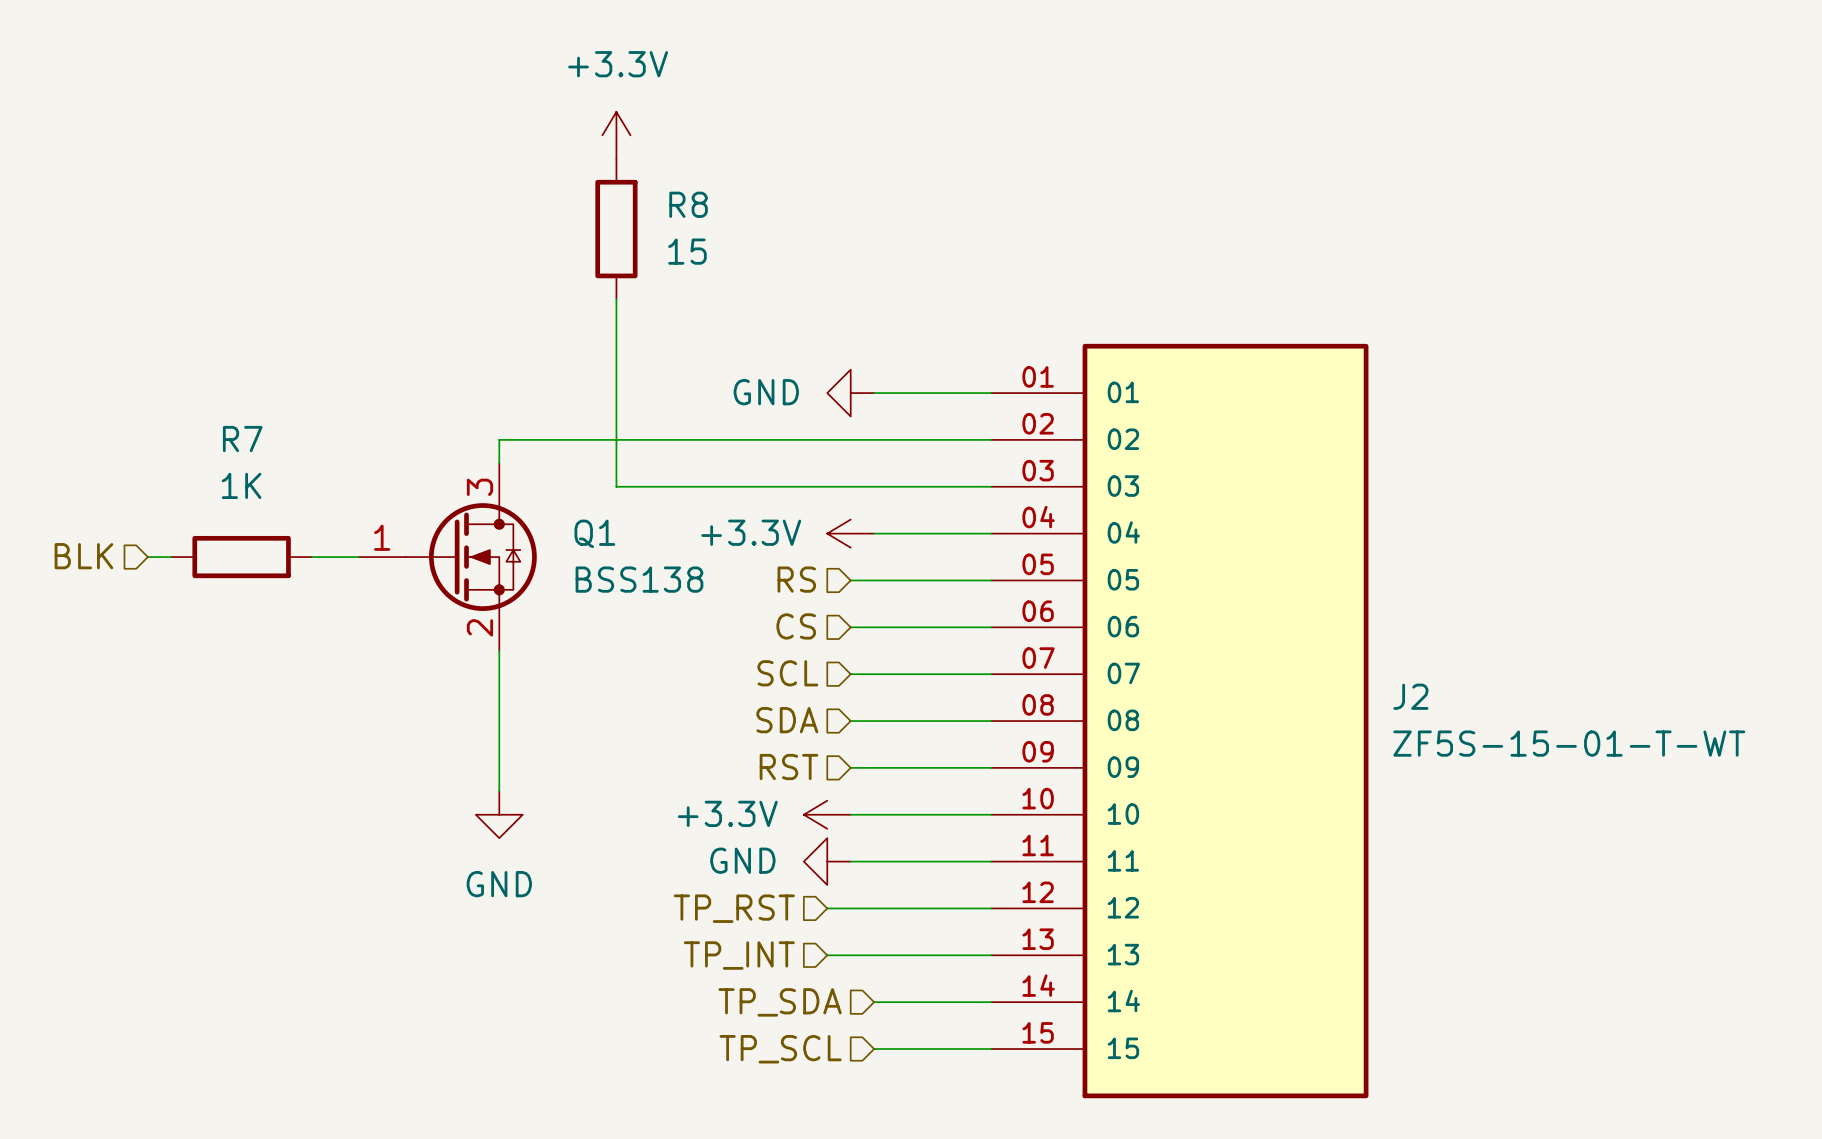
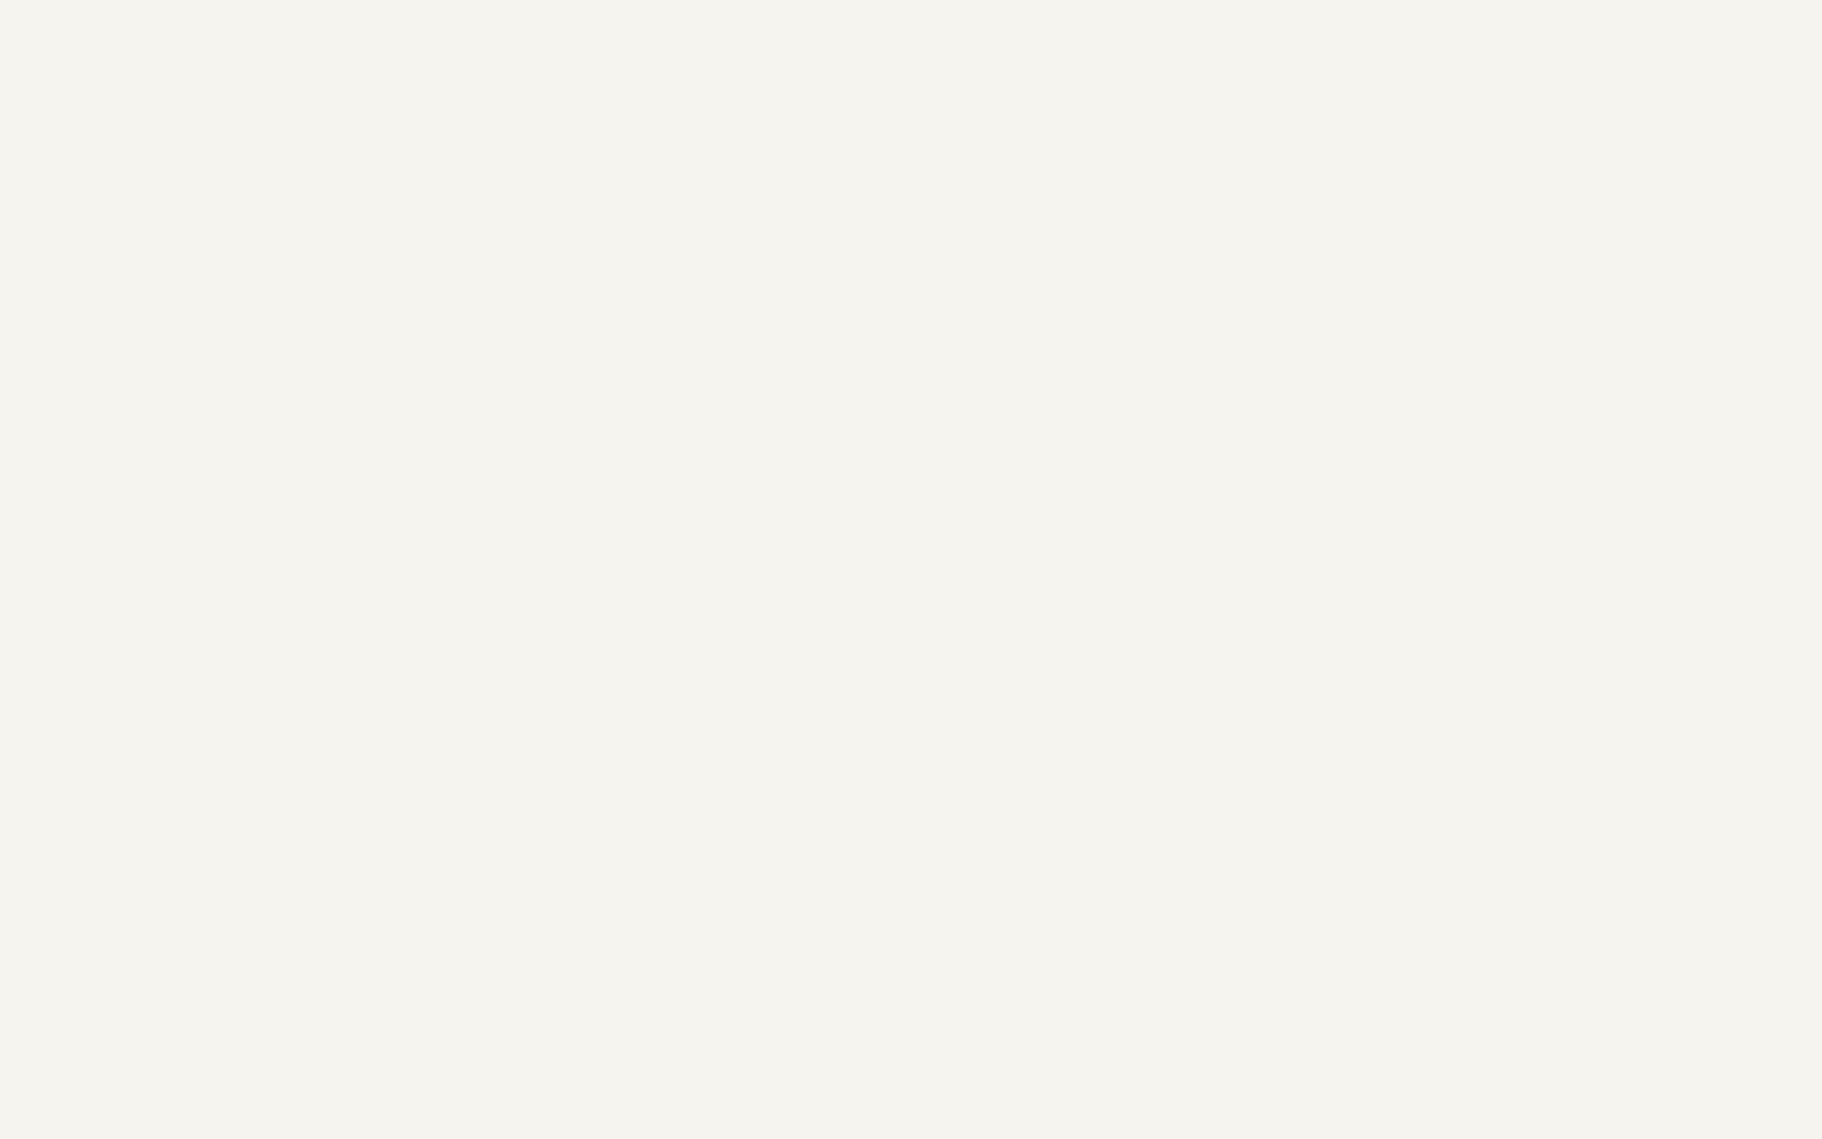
power symbol: +3.3V (616, 135) -> none
R8: 15 (616, 229) -> none
wire: (616, 299) (616, 486) (991, 486) -> none
power symbol: GND (850, 393) -> none
wire: (874, 393) (991, 393) -> none
wire: (991, 439) (499, 439) (499, 463) -> none
power symbol: +3.3V (850, 533) -> none
wire: (874, 533) (991, 533) -> none
hierarchical label: BLK (83, 556) -> none
wire: (147, 557) (171, 557) -> none
R7: 1K (241, 557) -> none
wire: (311, 557) (358, 557) -> none
Q1: BSS138 (447, 557) -> none
hierarchical label: RS (796, 579) -> none
wire: (850, 580) (991, 580) -> none
hierarchical label: CS (796, 626) -> none
wire: (850, 627) (991, 627) -> none
wire: (499, 650) (499, 791) -> none
hierarchical label: SCL (787, 673) -> none
wire: (850, 674) (991, 674) -> none
hierarchical label: SDA (787, 720) -> none
wire: (850, 721) (991, 721) -> none
J2: ZF5S-15-01-T-WT (1179, 721) -> none
hierarchical label: RST (788, 767) -> none
wire: (850, 767) (991, 767) -> none
power symbol: GND (499, 814) -> none
power symbol: +3.3V (827, 814) -> none
wire: (850, 814) (991, 814) -> none
power symbol: GND (827, 861) -> none
wire: (850, 861) (991, 861) -> none
hierarchical label: TP_RST (734, 908) -> none
wire: (827, 908) (991, 908) -> none
hierarchical label: TP_INT (739, 955) -> none
wire: (827, 955) (991, 955) -> none
hierarchical label: TP_SDA (780, 1002) -> none
wire: (874, 1002) (991, 1002) -> none
hierarchical label: TP_SCL (780, 1049) -> none
wire: (874, 1049) (991, 1049) -> none

